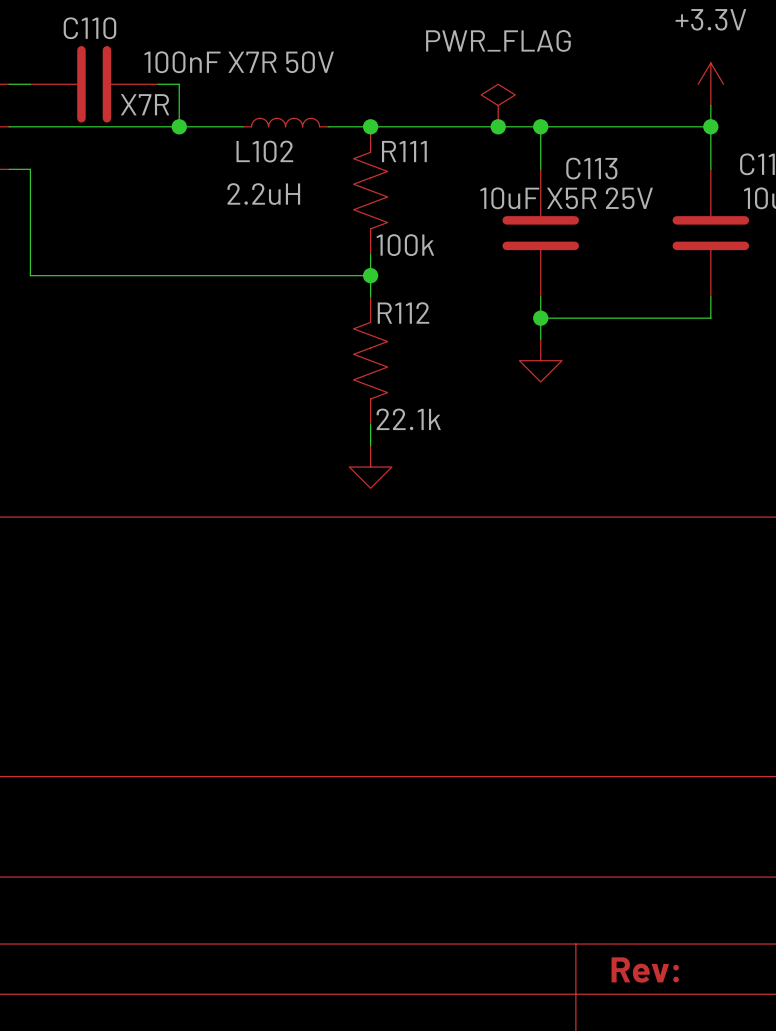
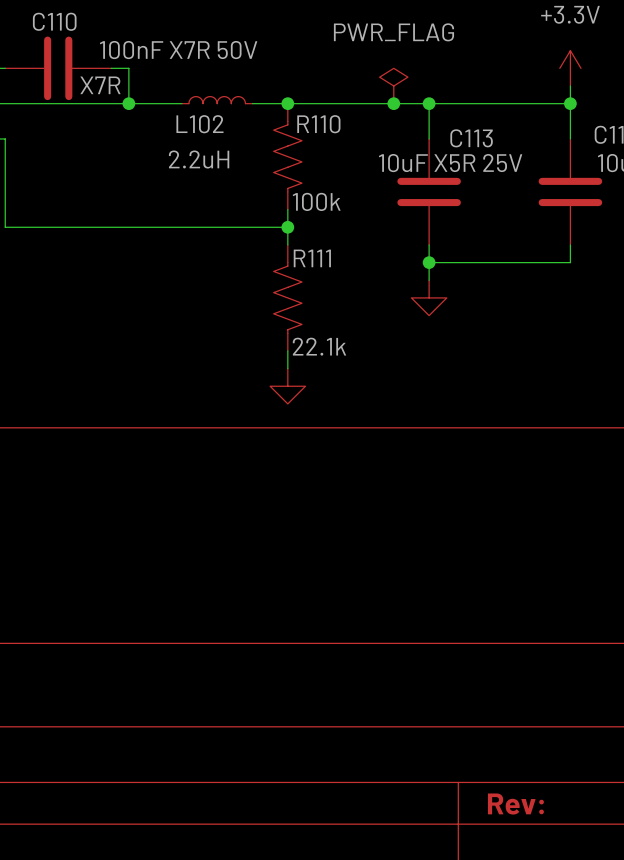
R111 name: R111 (404, 151) -> R110 (318, 124)
R112 name: R112 (403, 313) -> R111 (312, 258)

